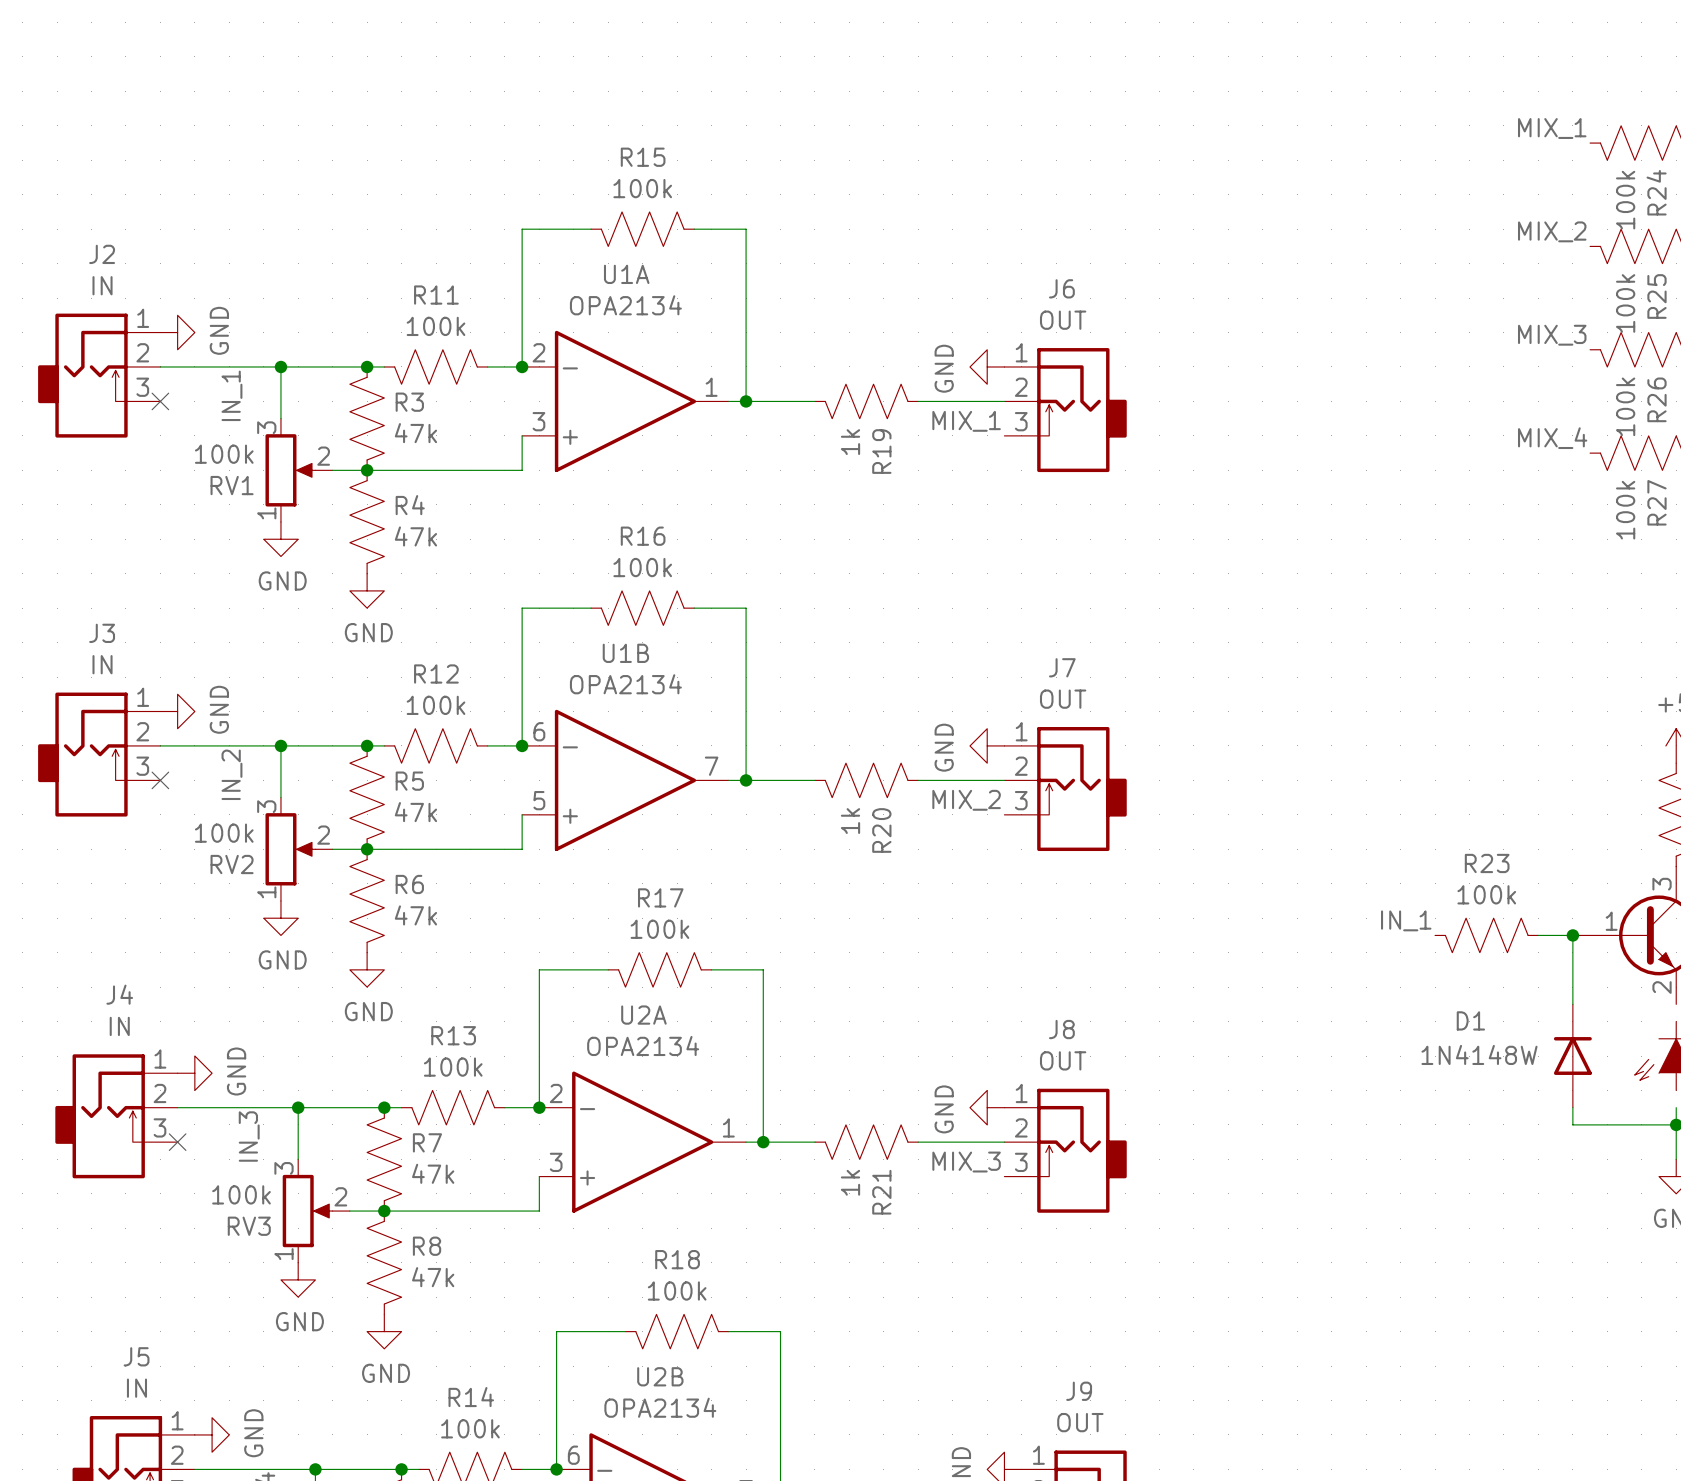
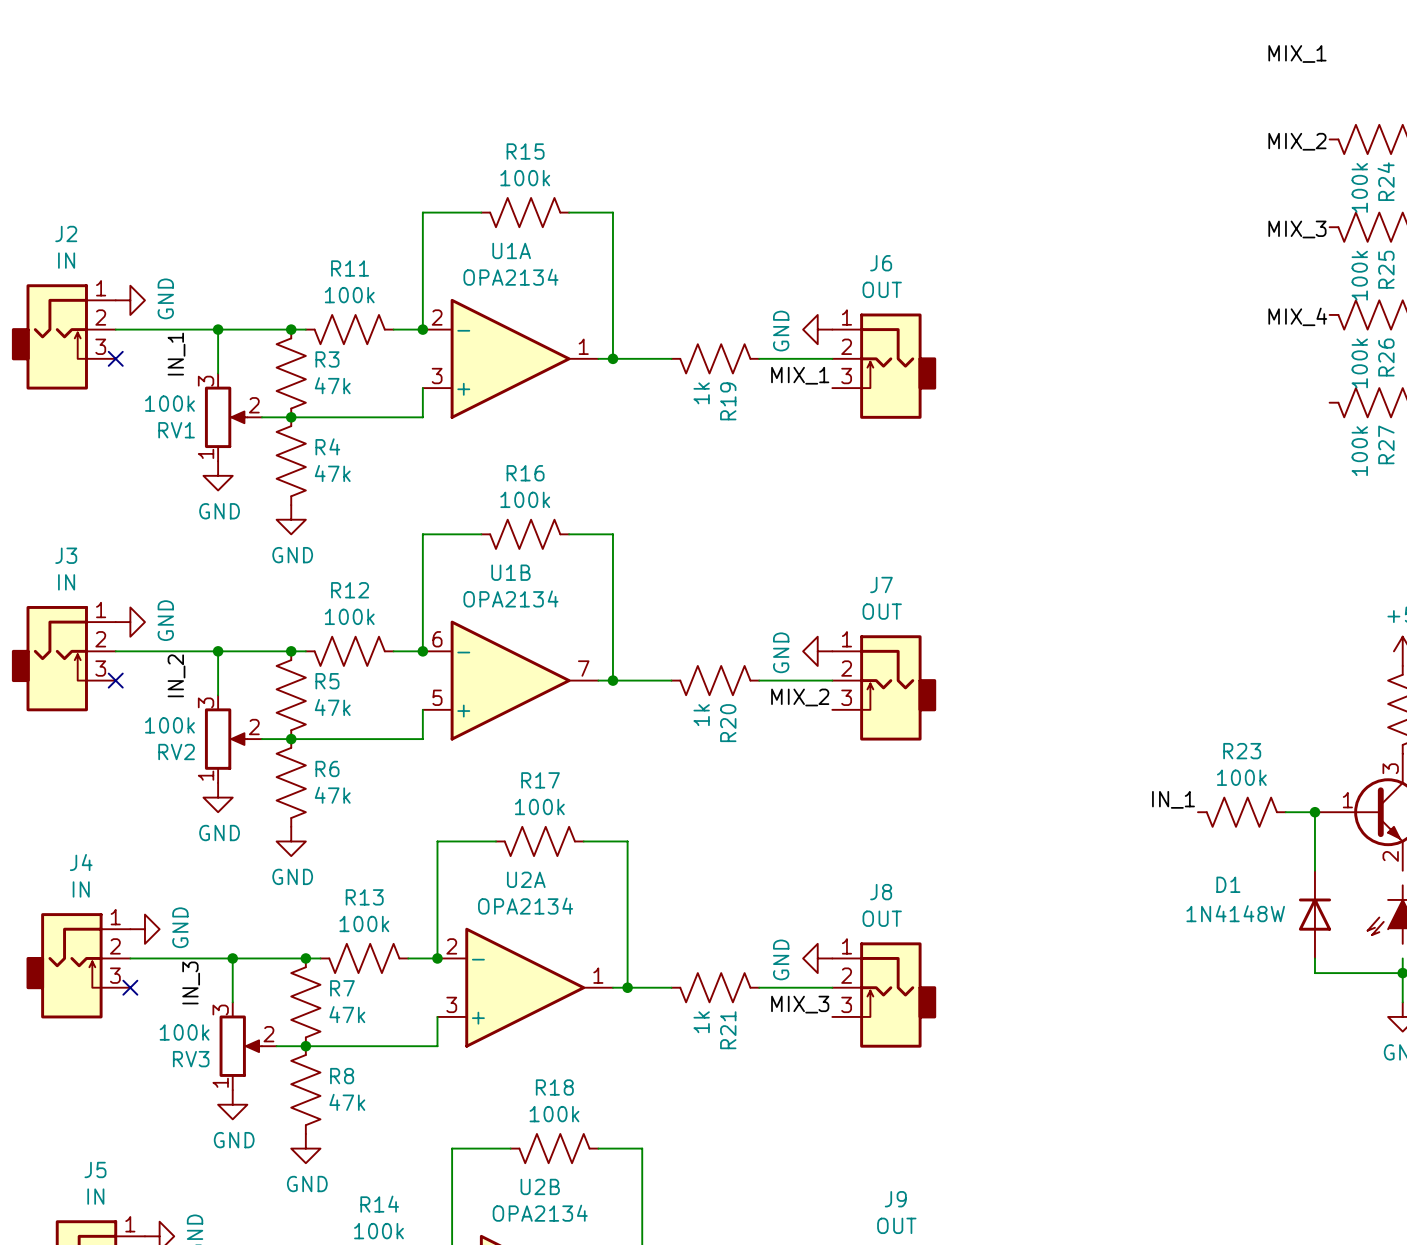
label position: MIX_1 (1552, 128) -> MIX_1 (1297, 53)
label position: MIX_2 (1552, 231) -> MIX_2 (1297, 141)
label position: MIX_3 (1552, 335) -> MIX_3 (1297, 229)
label position: MIX_4 (1552, 438) -> MIX_4 (1297, 316)

